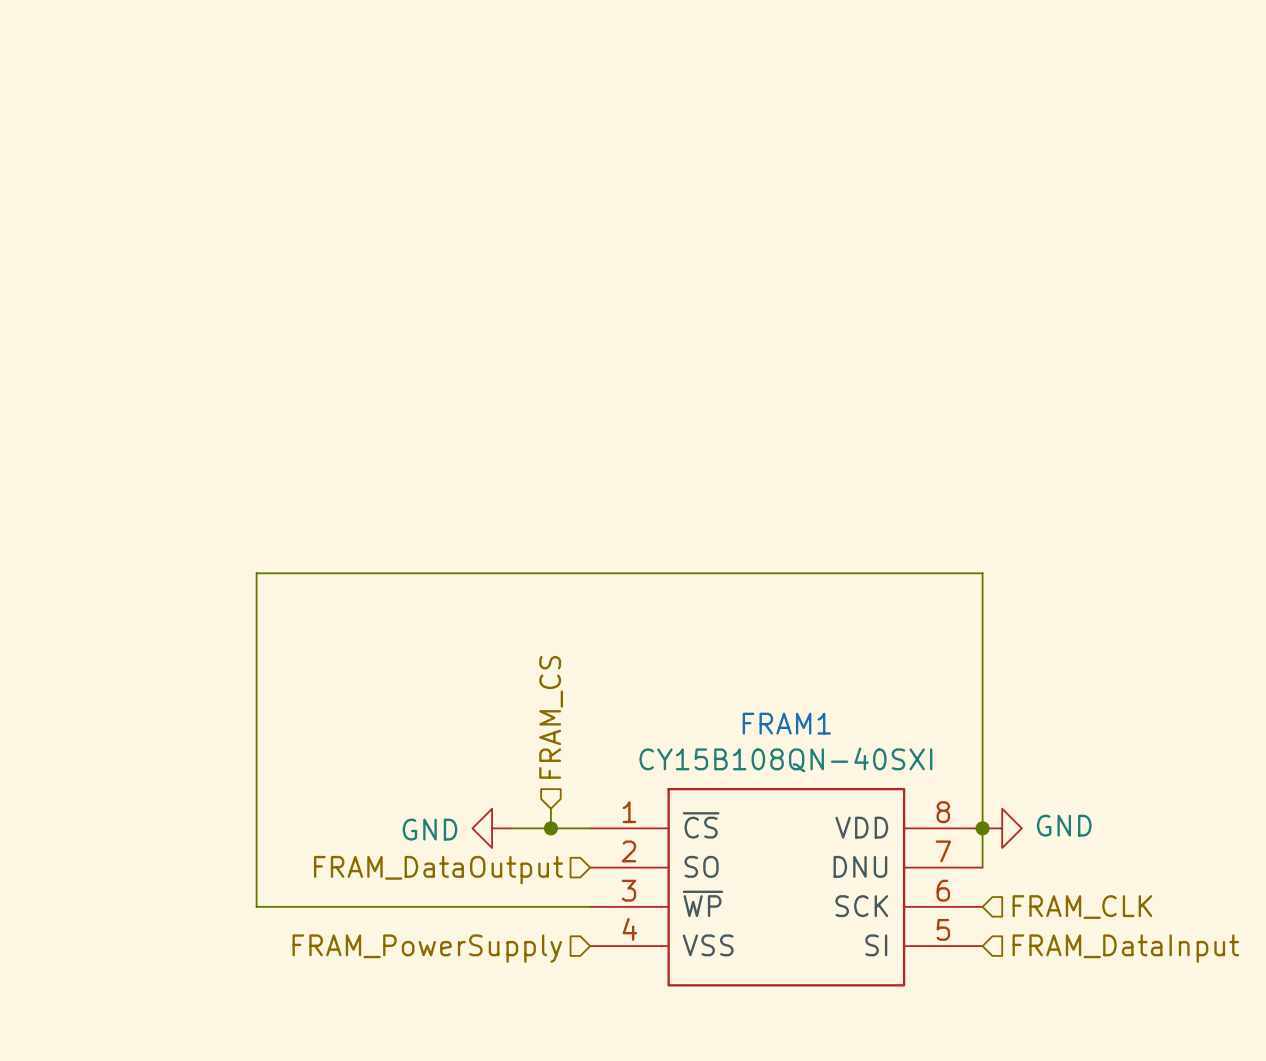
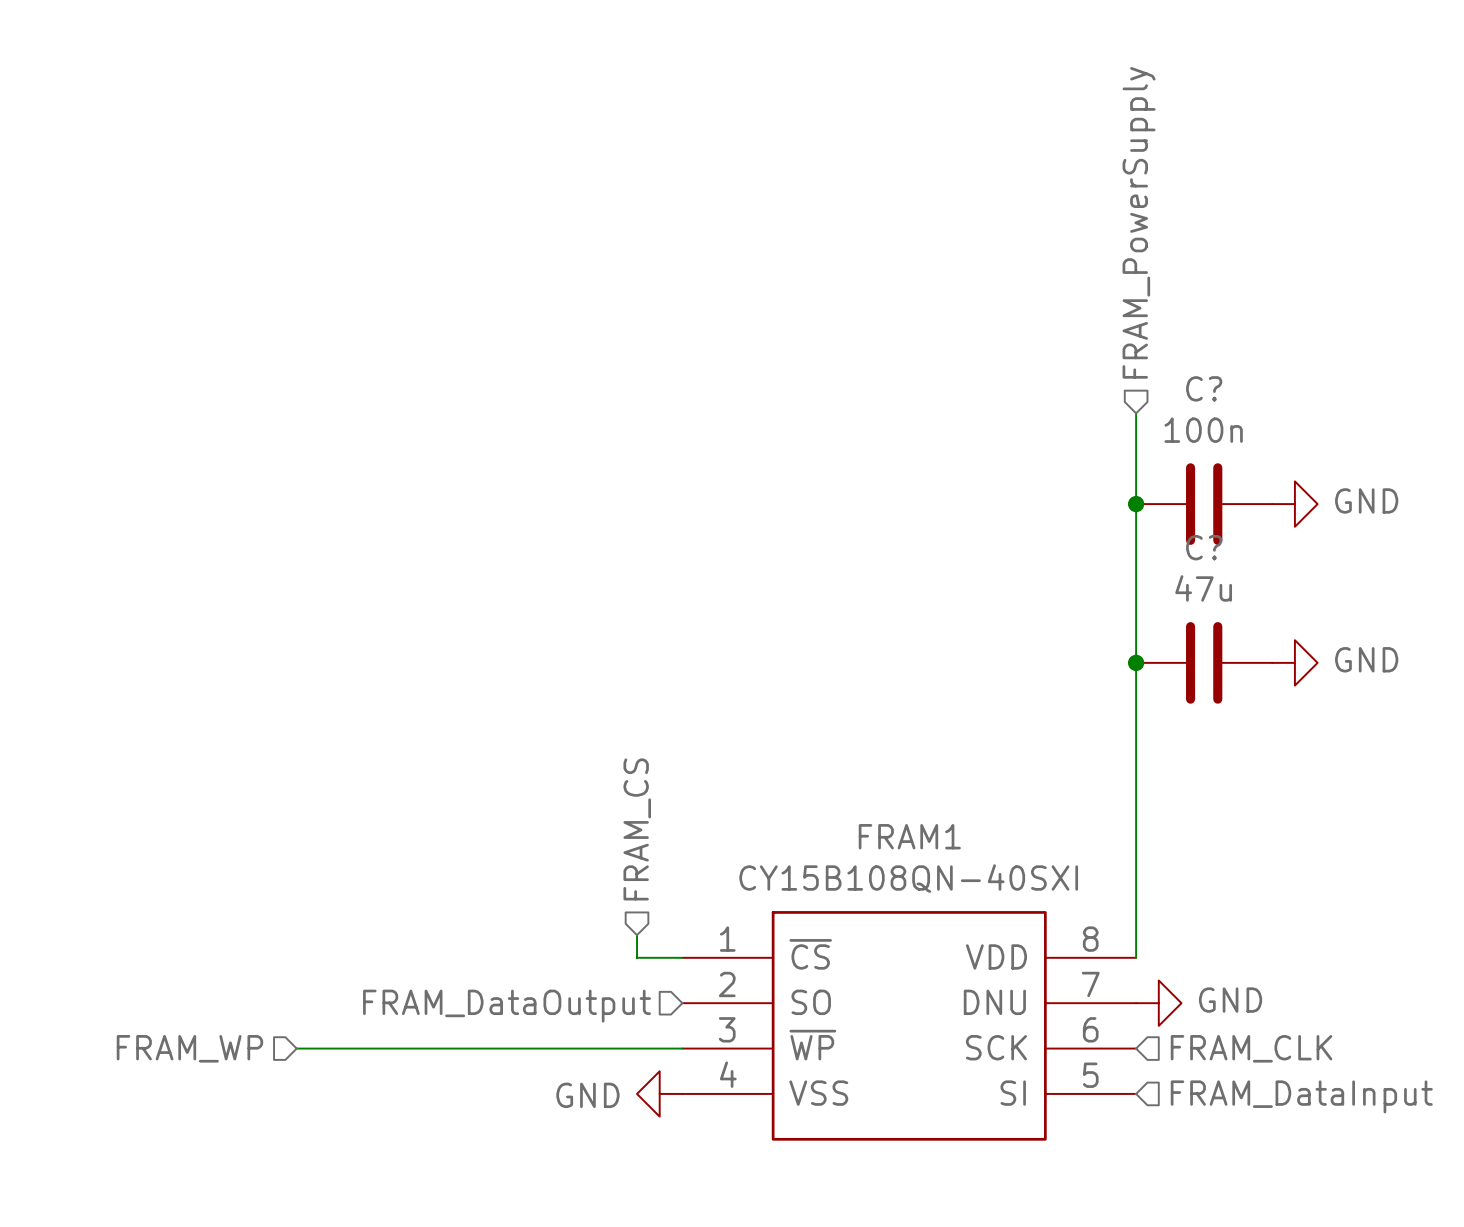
hierarchical label: none -> FRAM_PowerSupply (1139, 222)
junction: none -> (1136, 504)
C?: none -> 100n (1204, 504)
power symbol: none -> GND (1294, 504)
wire: (982, 573) (256, 573) (256, 906) -> (1136, 662) (1136, 413)
junction: none -> (1136, 662)
C?: none -> 47u (1204, 662)
power symbol: none -> GND (1294, 662)
power symbol position: GND (492, 828) -> GND (659, 1093)
wire: (511, 828) (550, 828) -> none
junction: (550, 828) -> none
wire: (982, 828) (982, 867) -> none
junction: (982, 828) -> none
power symbol position: GND (1002, 828) -> GND (1158, 1003)
hierarchical label: none -> FRAM_WP (189, 1048)
hierarchical label: FRAM_PowerSupply (427, 948) -> none

